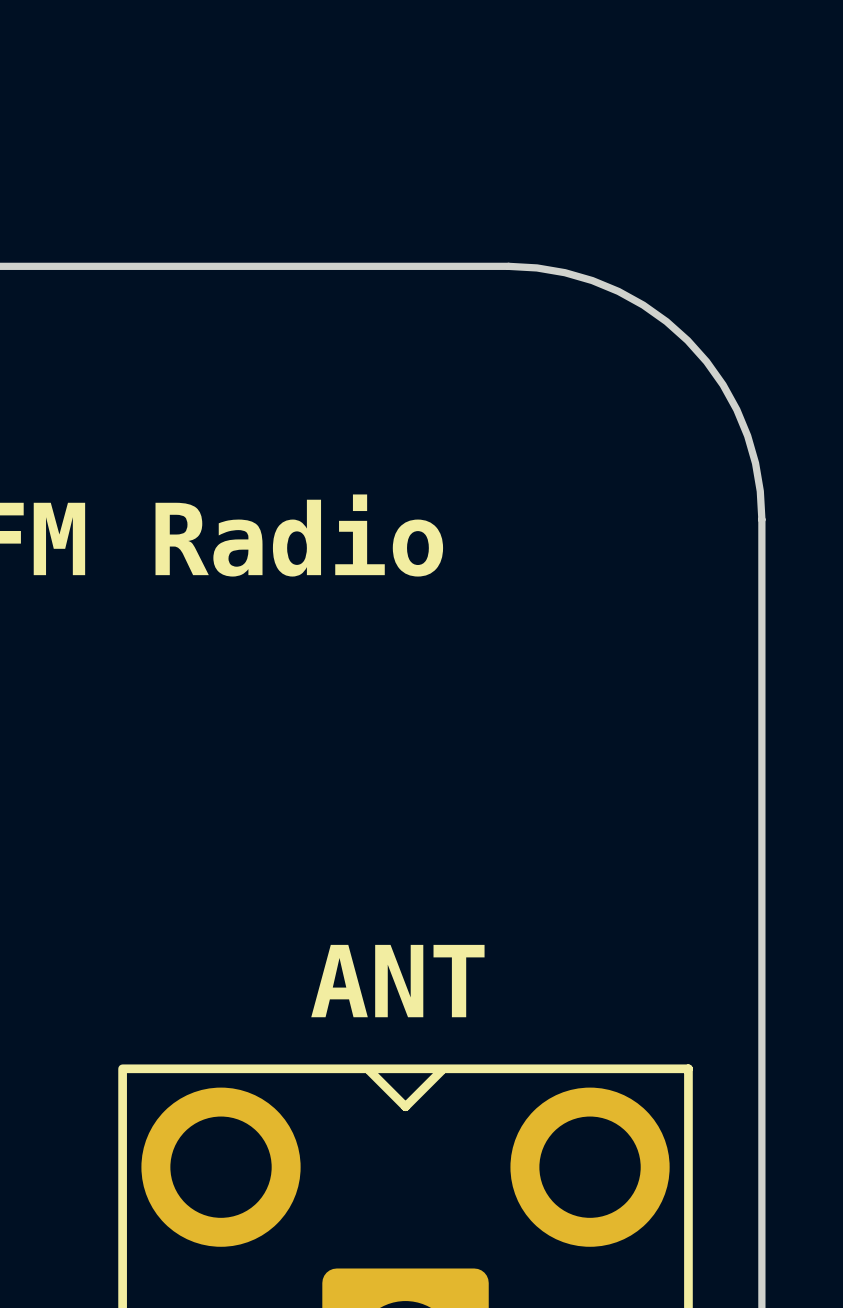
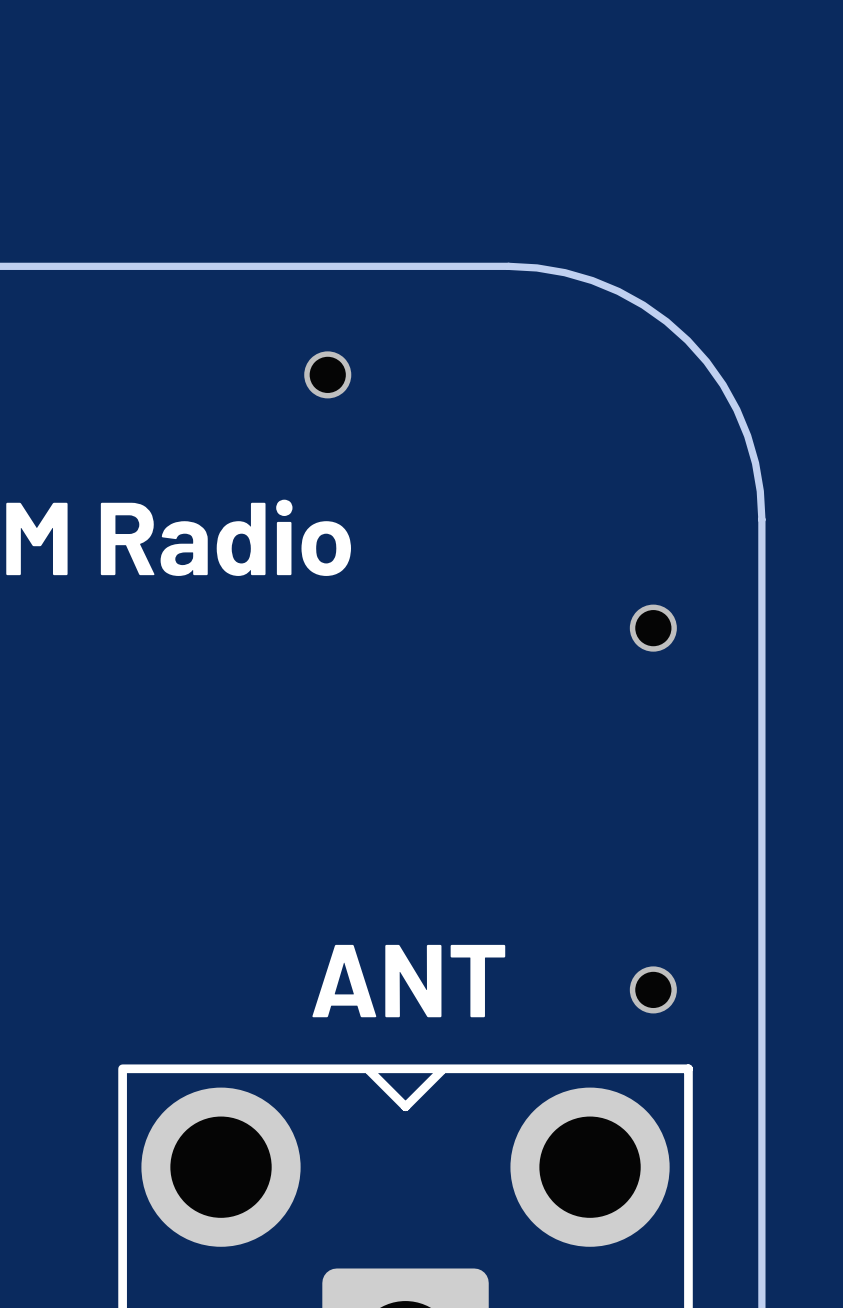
via: none -> (327, 374)
via: none -> (653, 628)
via: none -> (653, 989)

